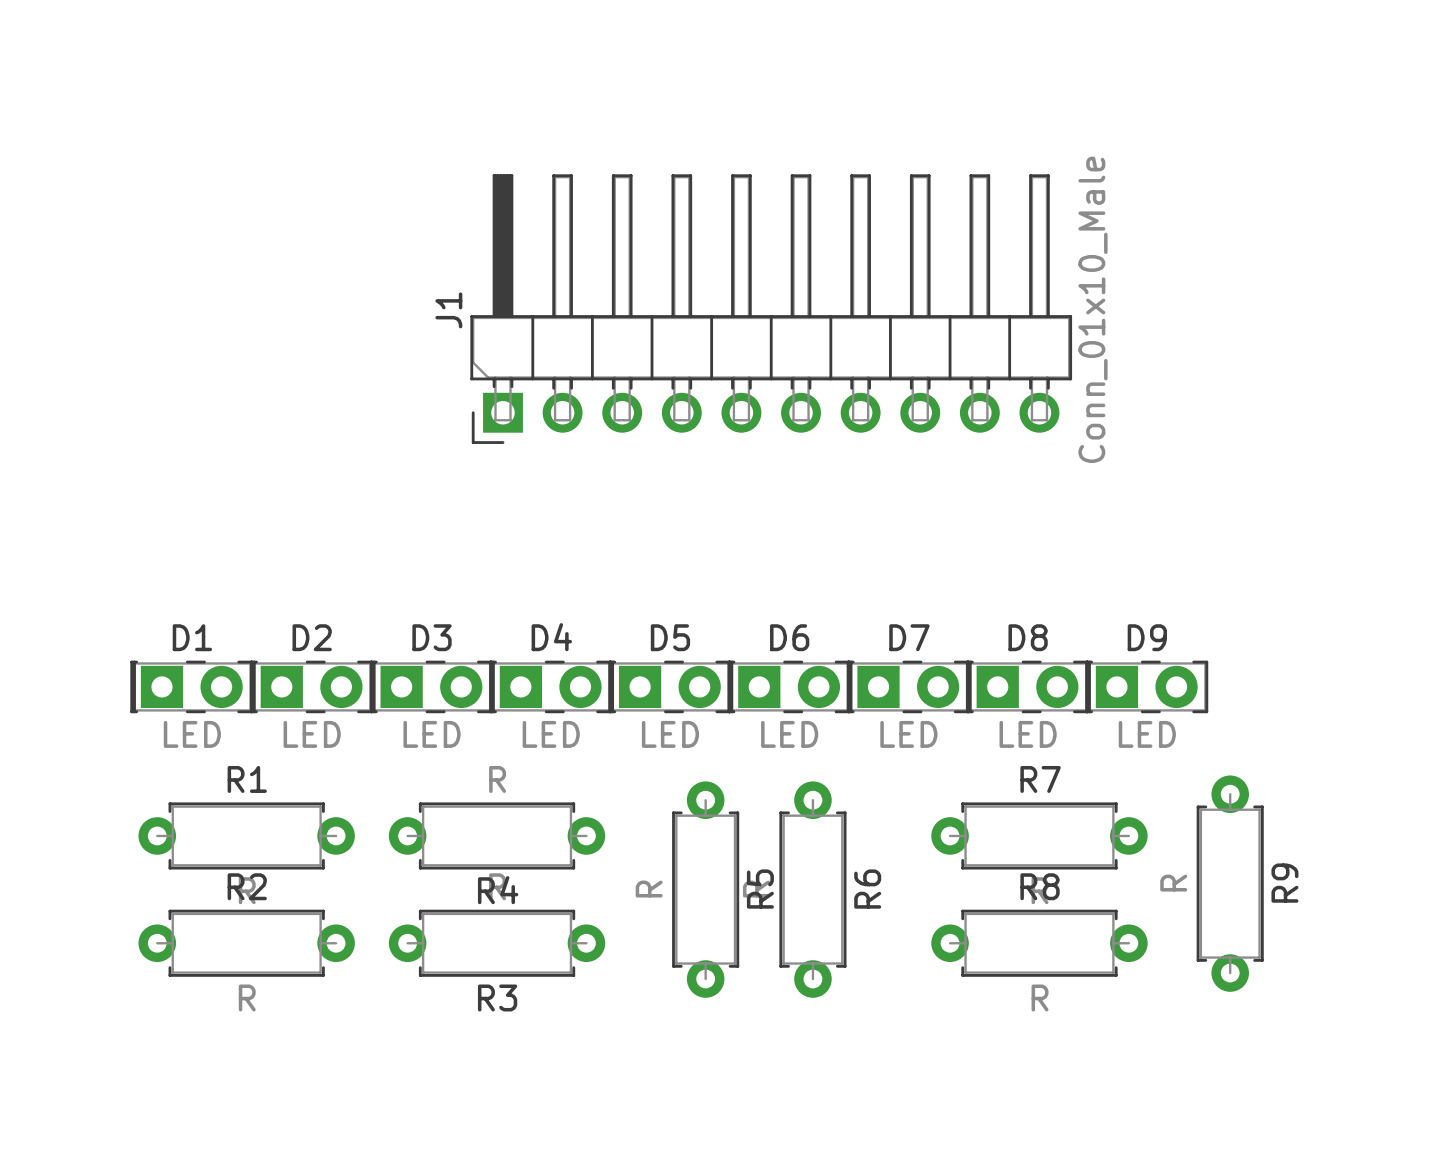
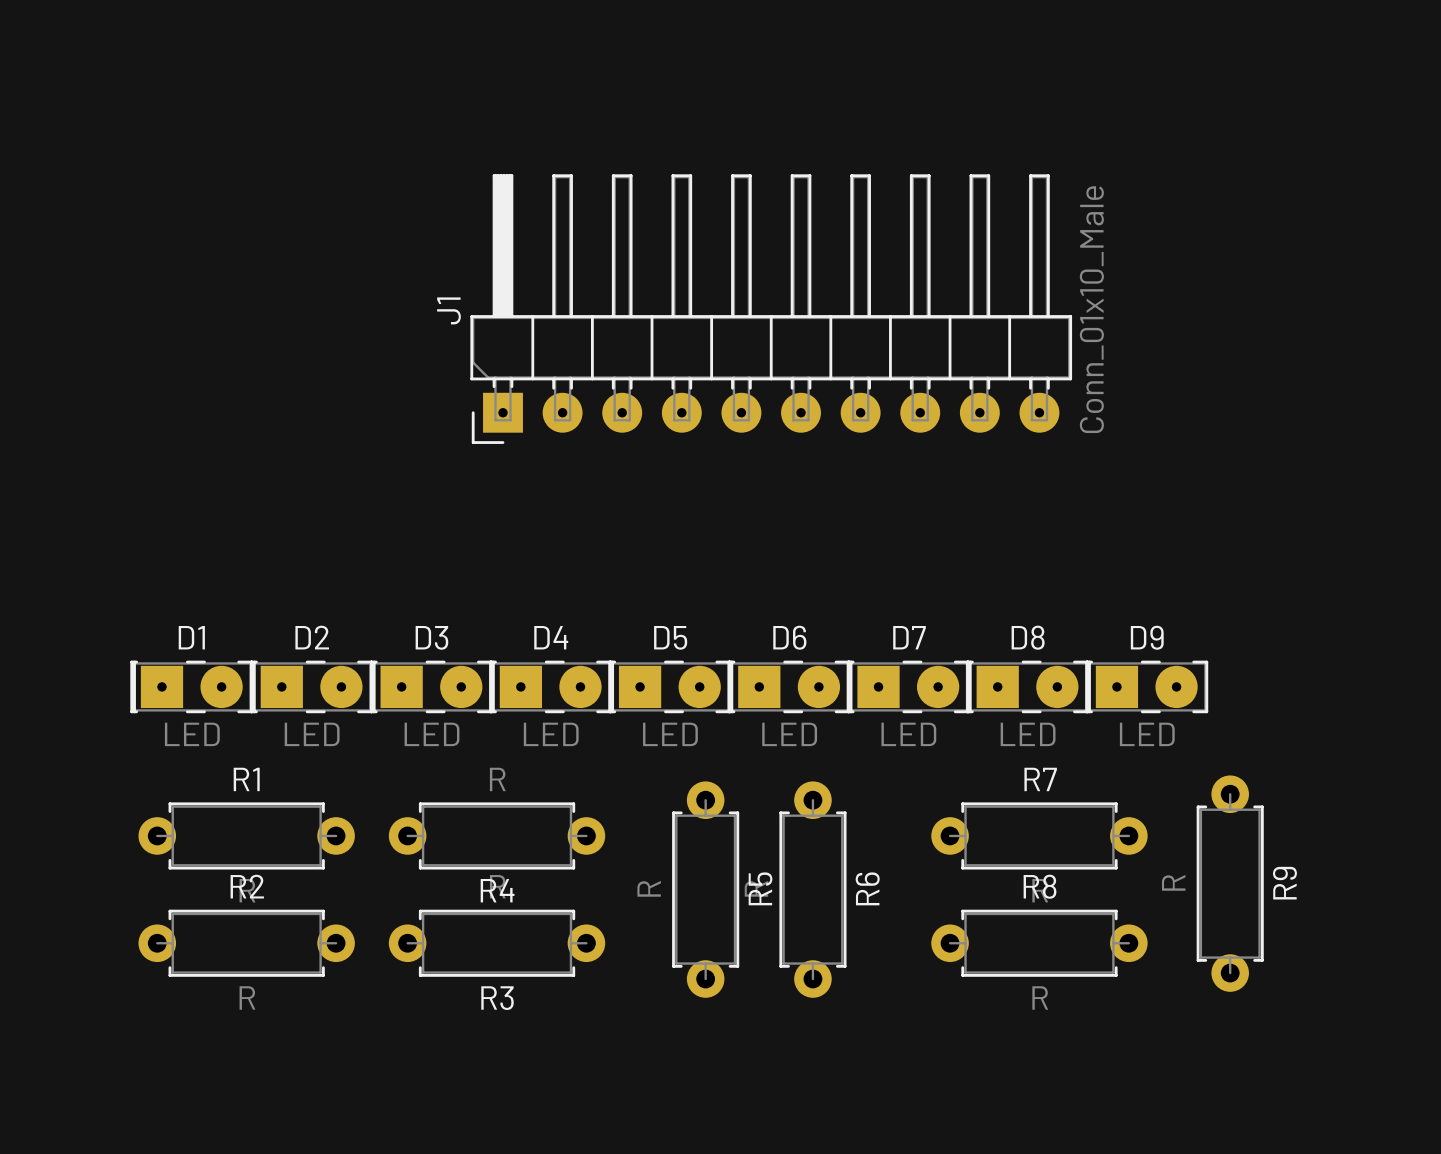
J1 footprint: [470, 174, 1073, 444] -> [470, 174, 1073, 444]
D1 footprint: [130, 660, 254, 714] -> [130, 660, 254, 714]
D2 footprint: [250, 660, 374, 714] -> [250, 660, 374, 714]
D3 footprint: [369, 660, 493, 714] -> [369, 660, 493, 714]
D4 footprint: [489, 660, 613, 714] -> [489, 660, 613, 714]
D5 footprint: [608, 660, 732, 714] -> [608, 660, 732, 714]
D6 footprint: [727, 660, 851, 714] -> [727, 660, 851, 714]
D7 footprint: [846, 660, 970, 714] -> [846, 660, 970, 714]
D8 footprint: [966, 660, 1090, 714] -> [966, 660, 1090, 714]
D9 footprint: [1085, 660, 1209, 714] -> [1085, 660, 1209, 714]

